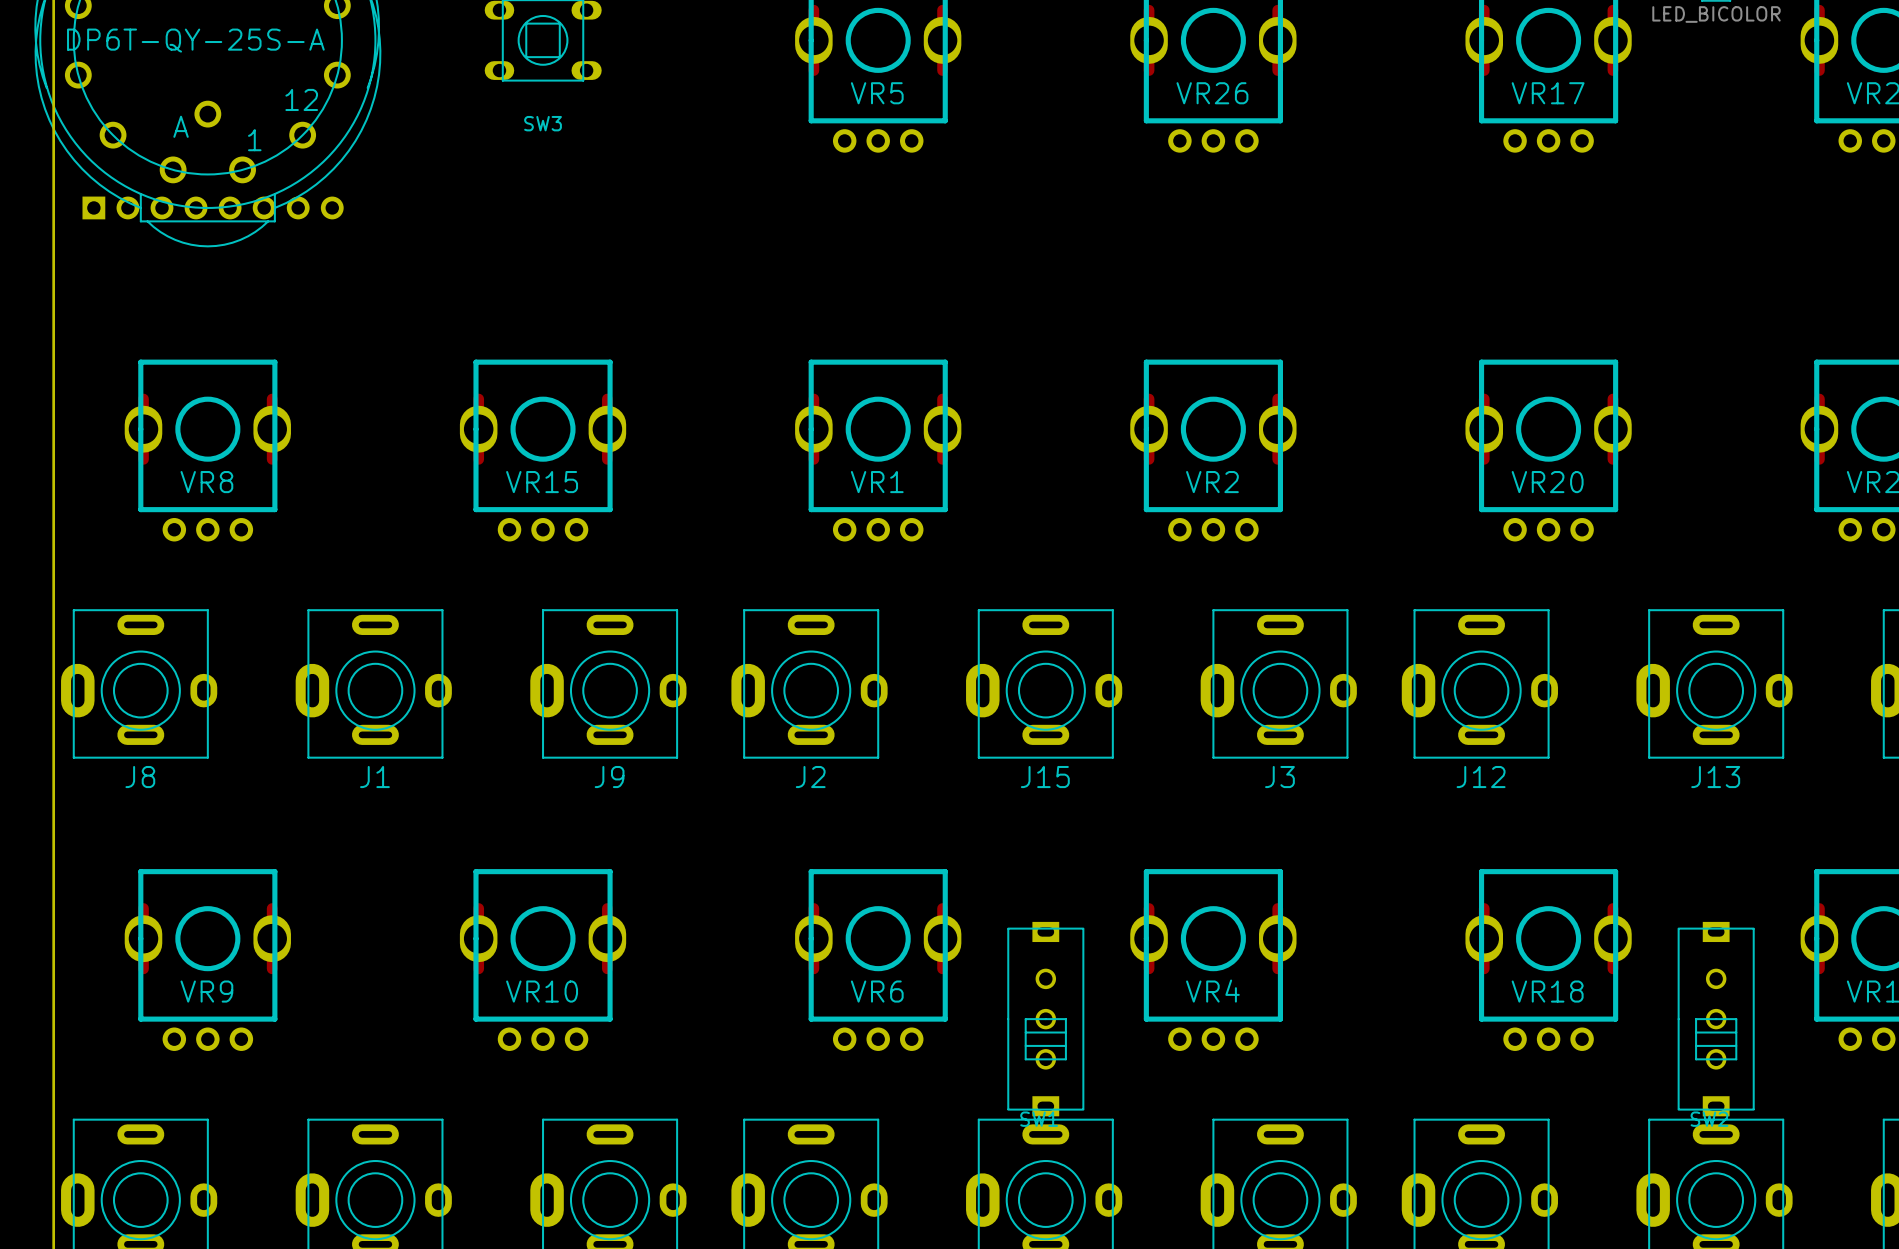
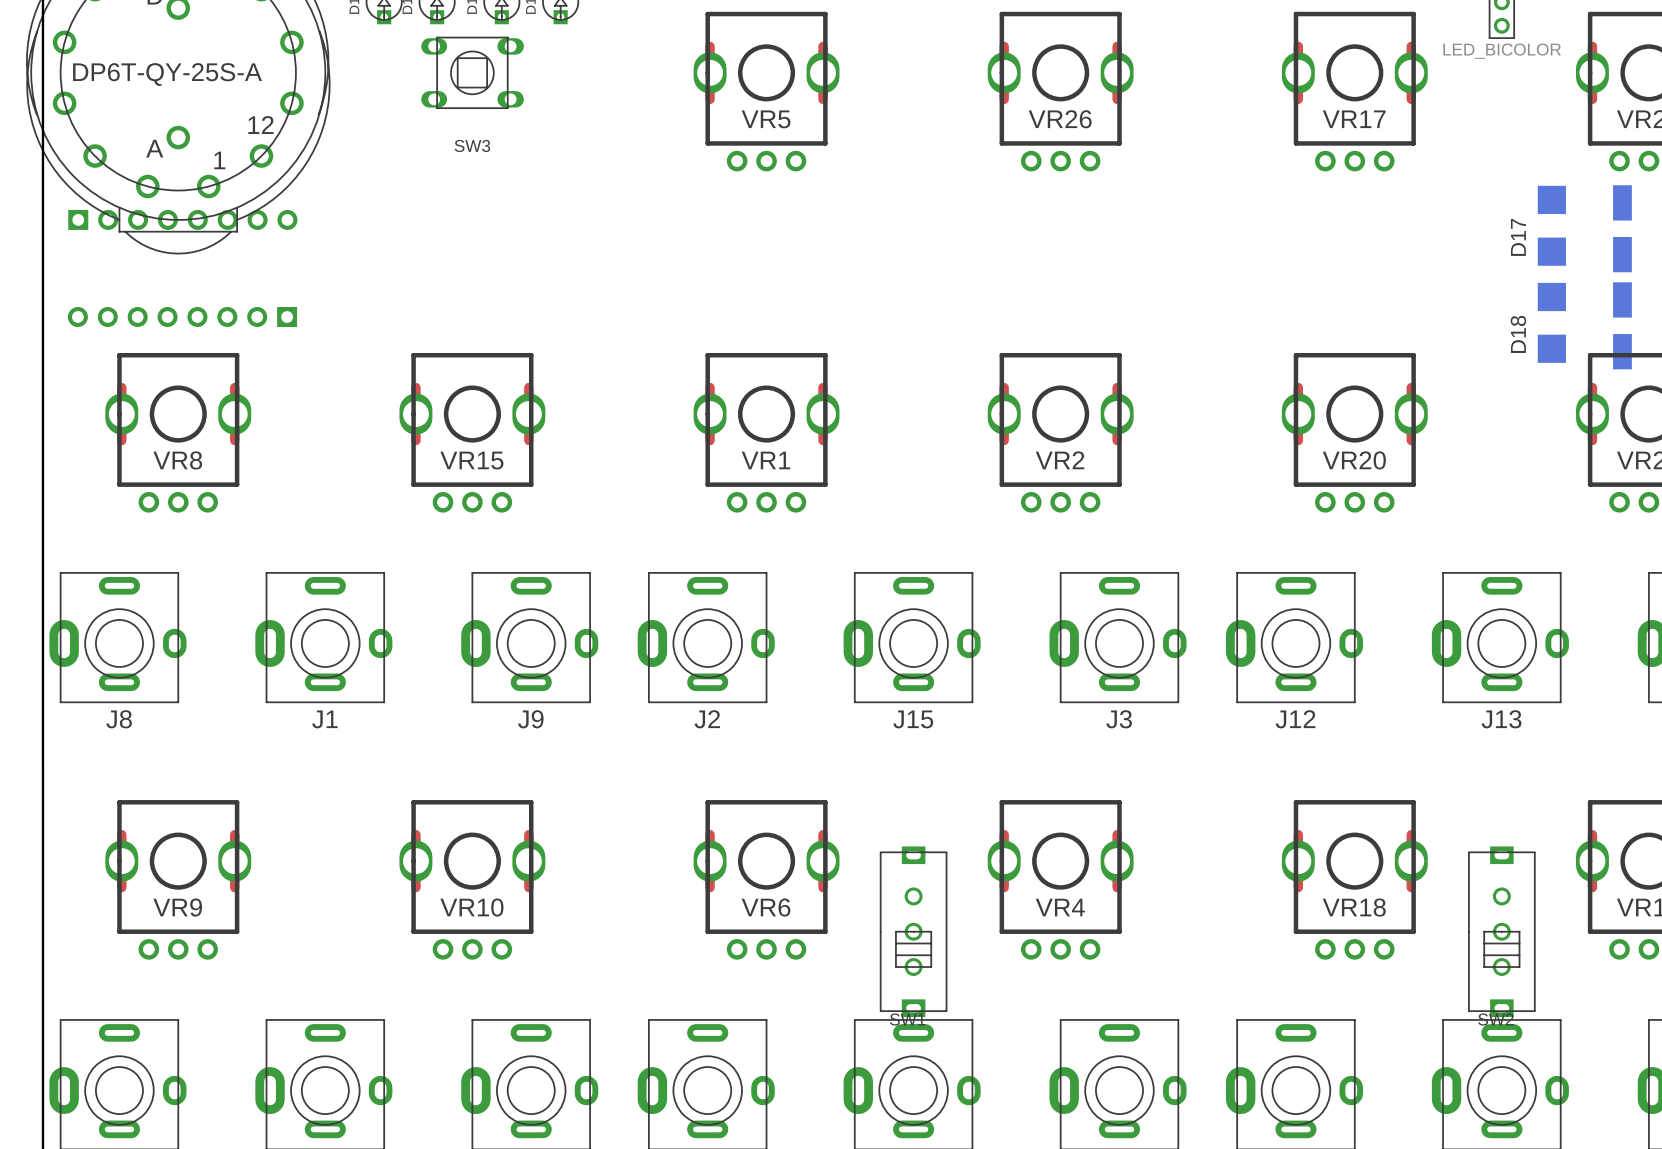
D17: none -> (1551, 225)
part: none -> (1622, 228)
part: none -> (182, 316)
D18: none -> (1551, 322)
part: none -> (1622, 325)

